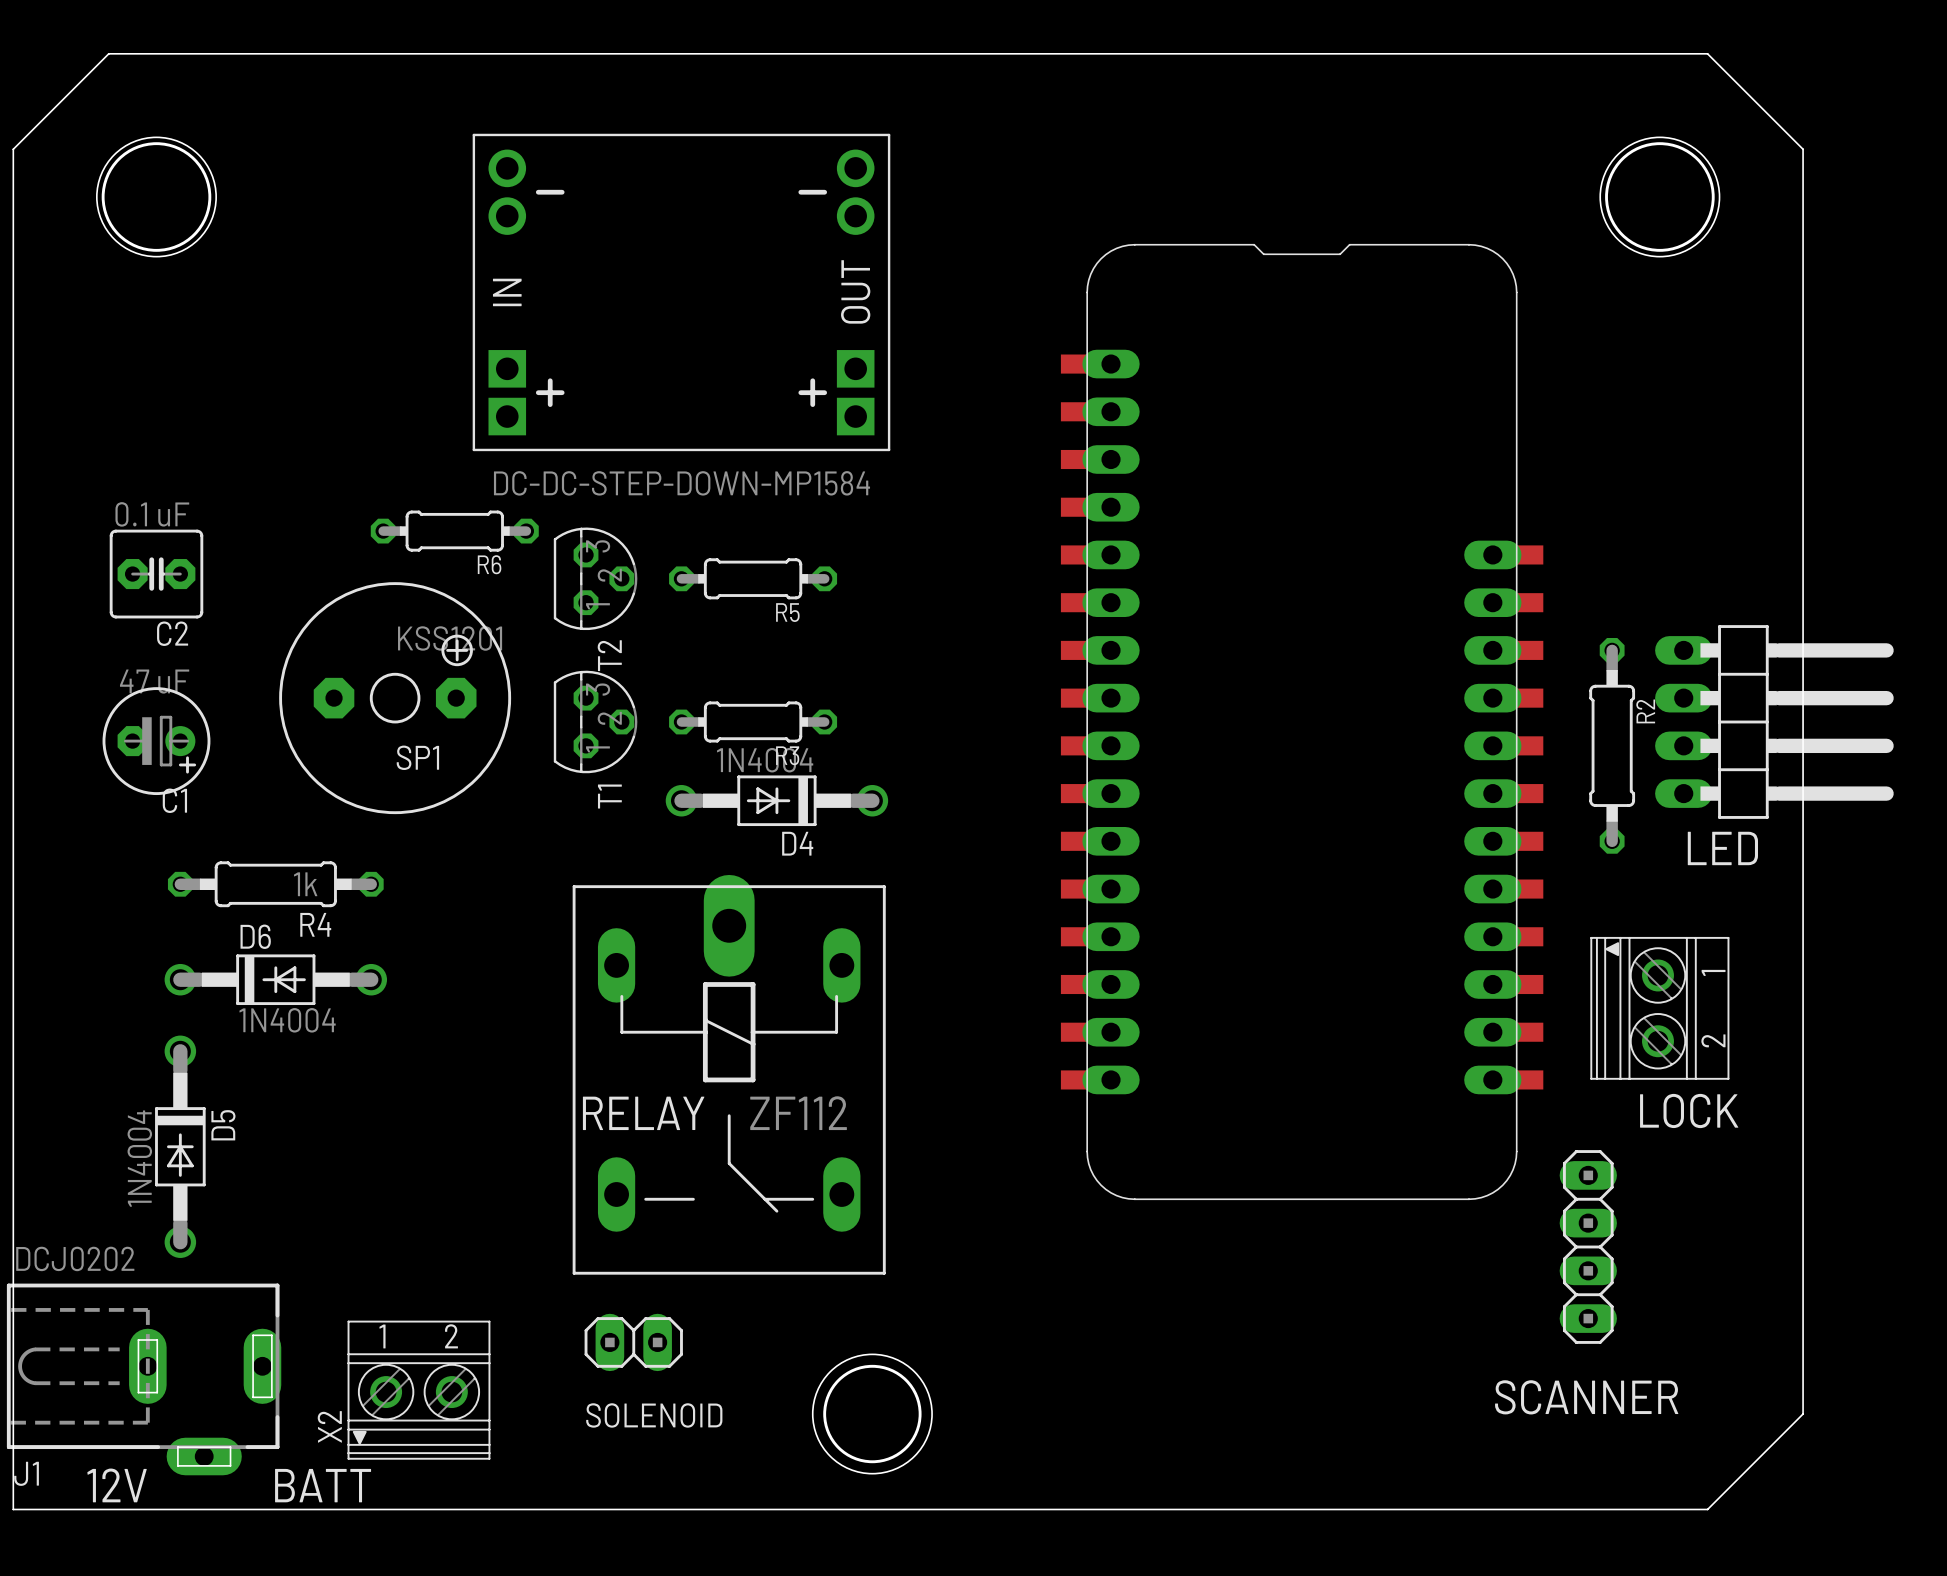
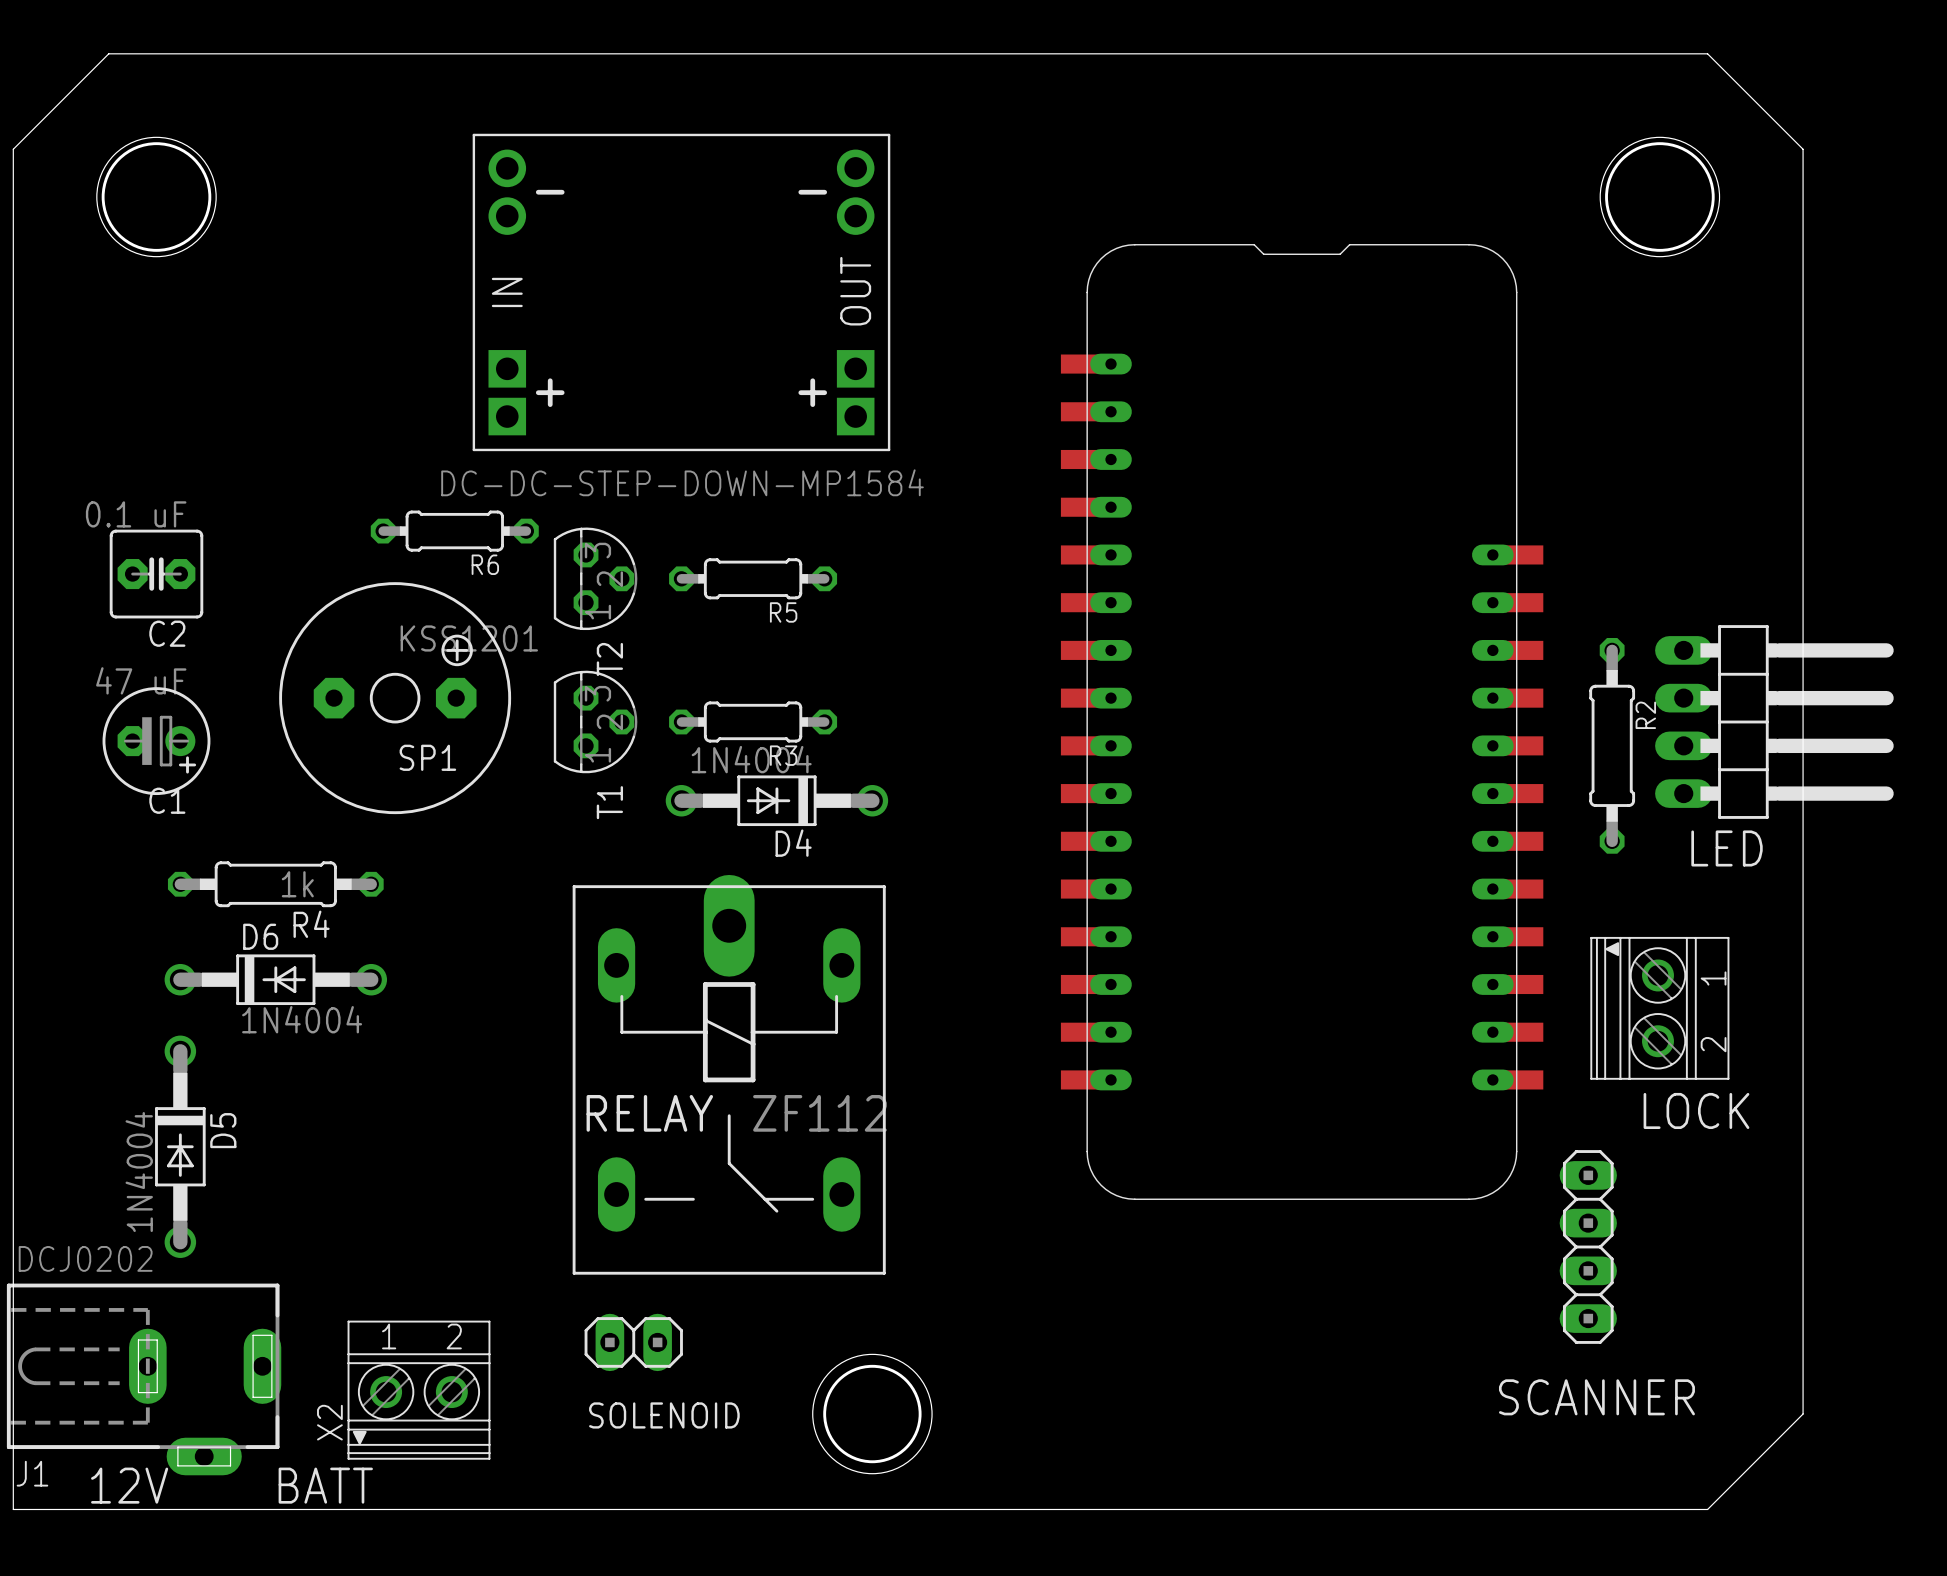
part footprint: [1060, 244, 1544, 1200] -> [1060, 244, 1544, 1200]

